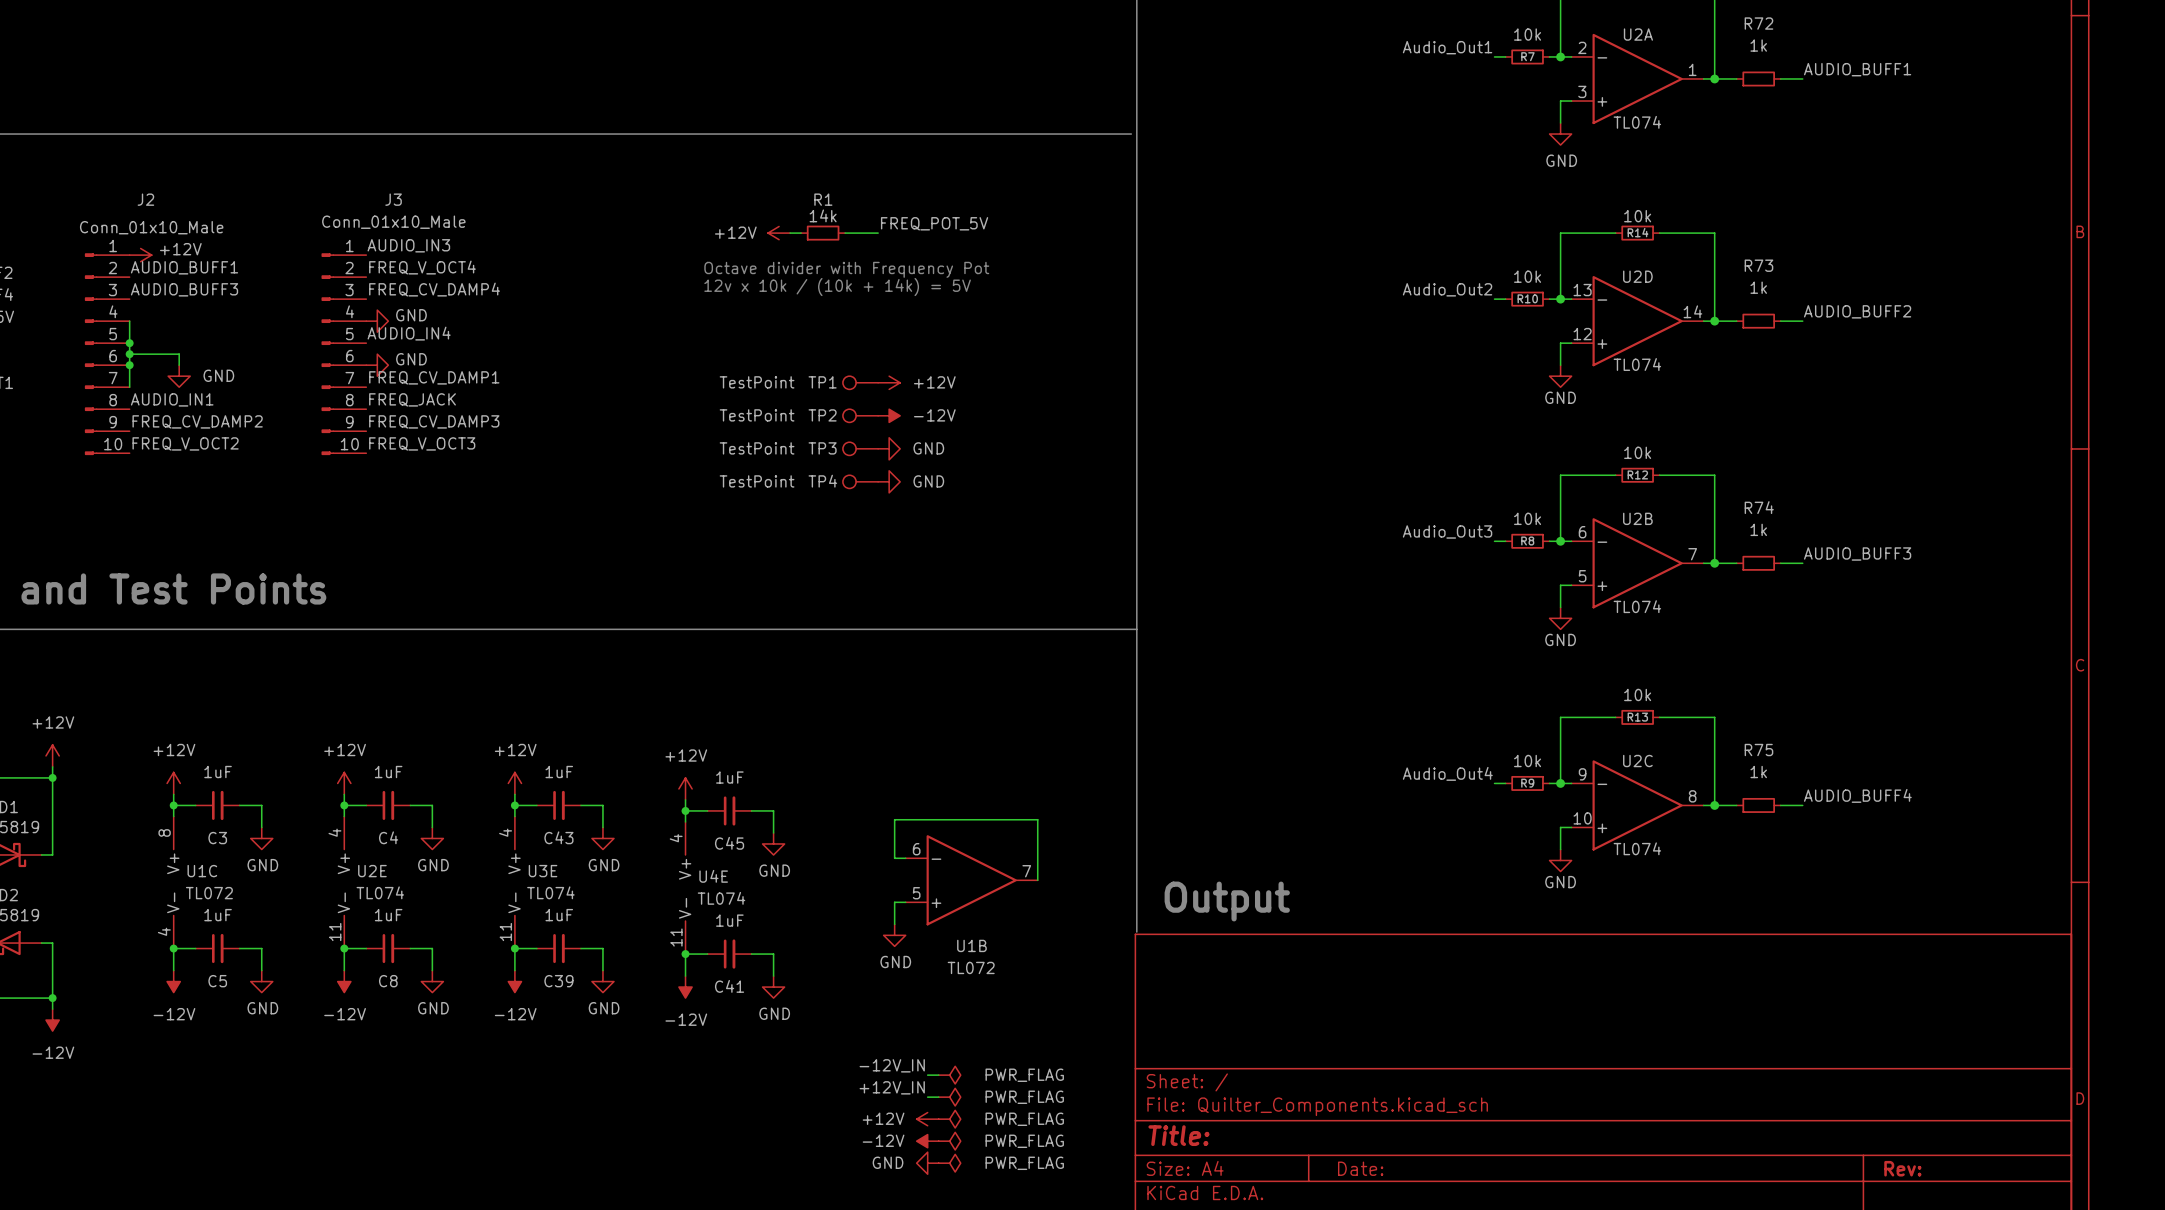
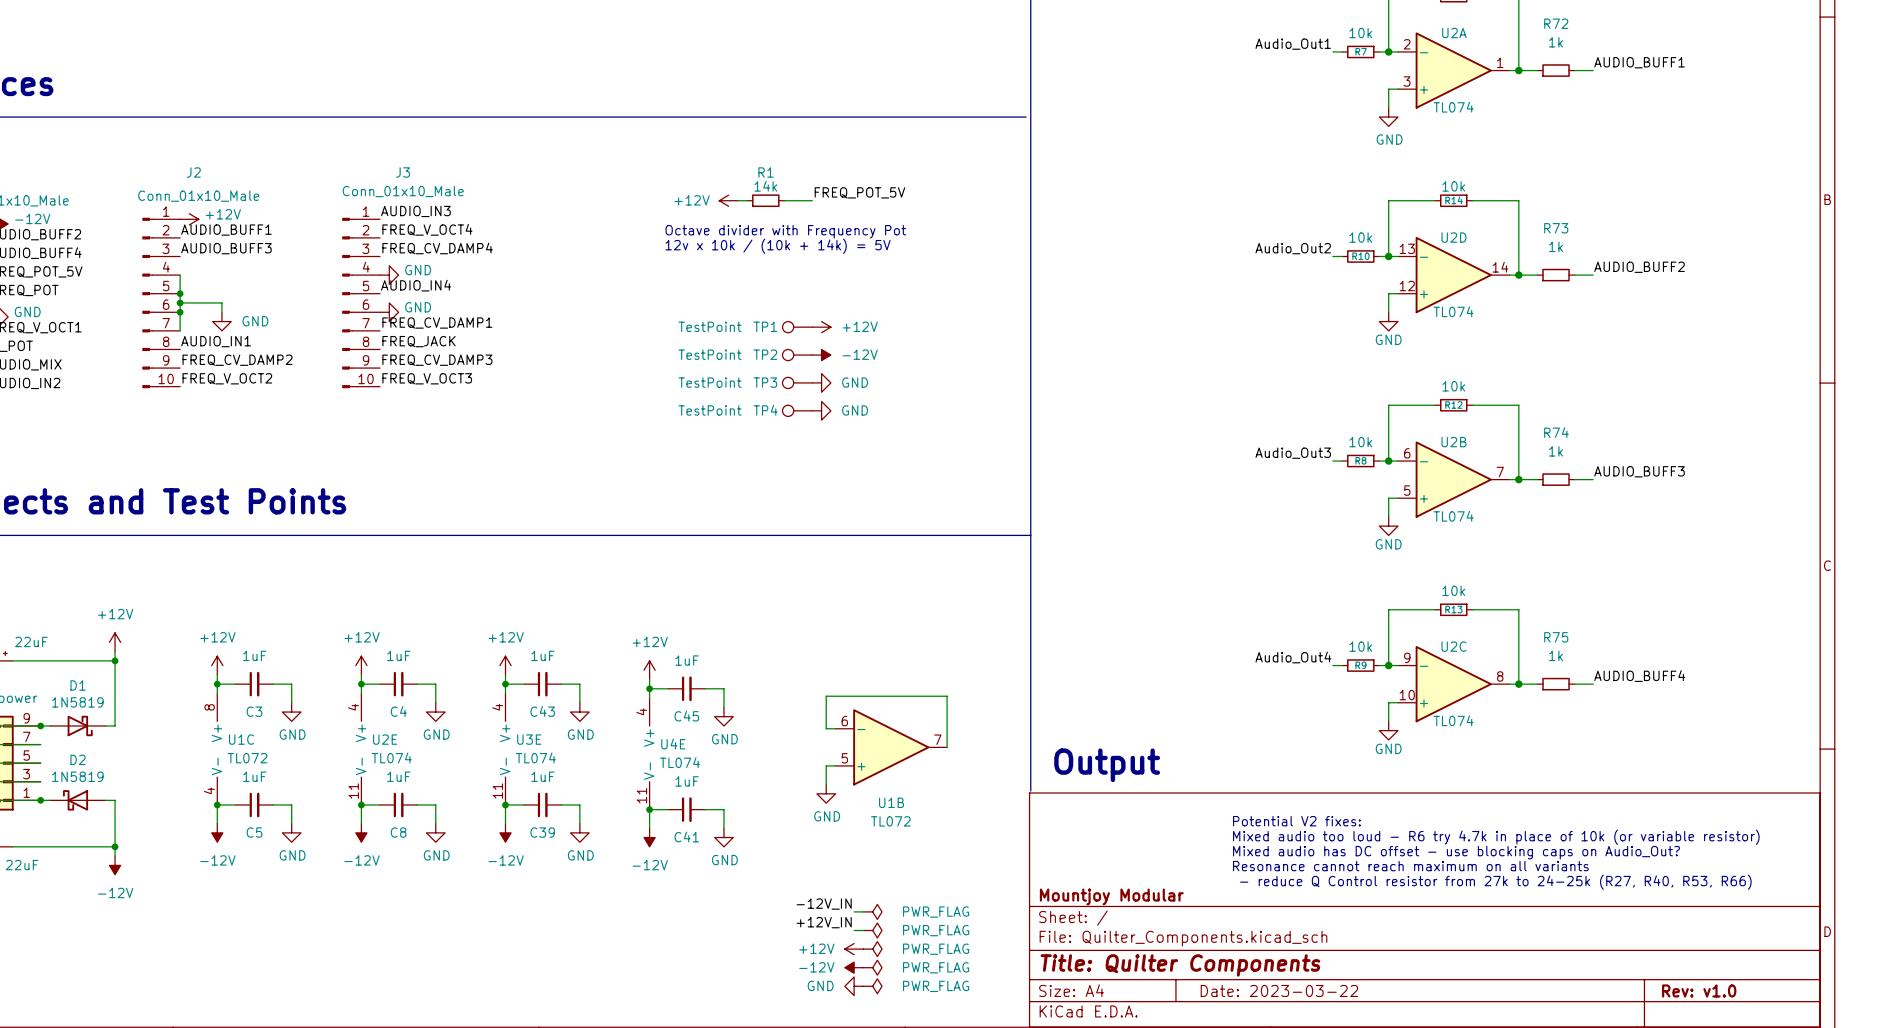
text: none -> Potential V2 fixes: (1296, 821)
text: none -> Mixed audio too loud - R6 try 4.7k in place of 10k (or variable resistor) (1496, 837)
text: none -> Mixed audio has DC offset - use blocking caps on Audio_Out? (1456, 852)
text: none -> Resonance cannot reach maximum on all variants (1410, 866)
text: none -> - reduce Q Control resistor from 27k to 24-25k (R27, R40, R53, R66) (1495, 882)
title block: none -> Mountjoy Modular (1111, 896)
title block: Title: (1178, 1135) -> Title: Quilter Components (1180, 965)
title block: Date: (1360, 1168) -> Date: 2023-03-22 (1279, 990)
title block: Rev: (1902, 1168) -> Rev: v1.0 (1699, 990)

